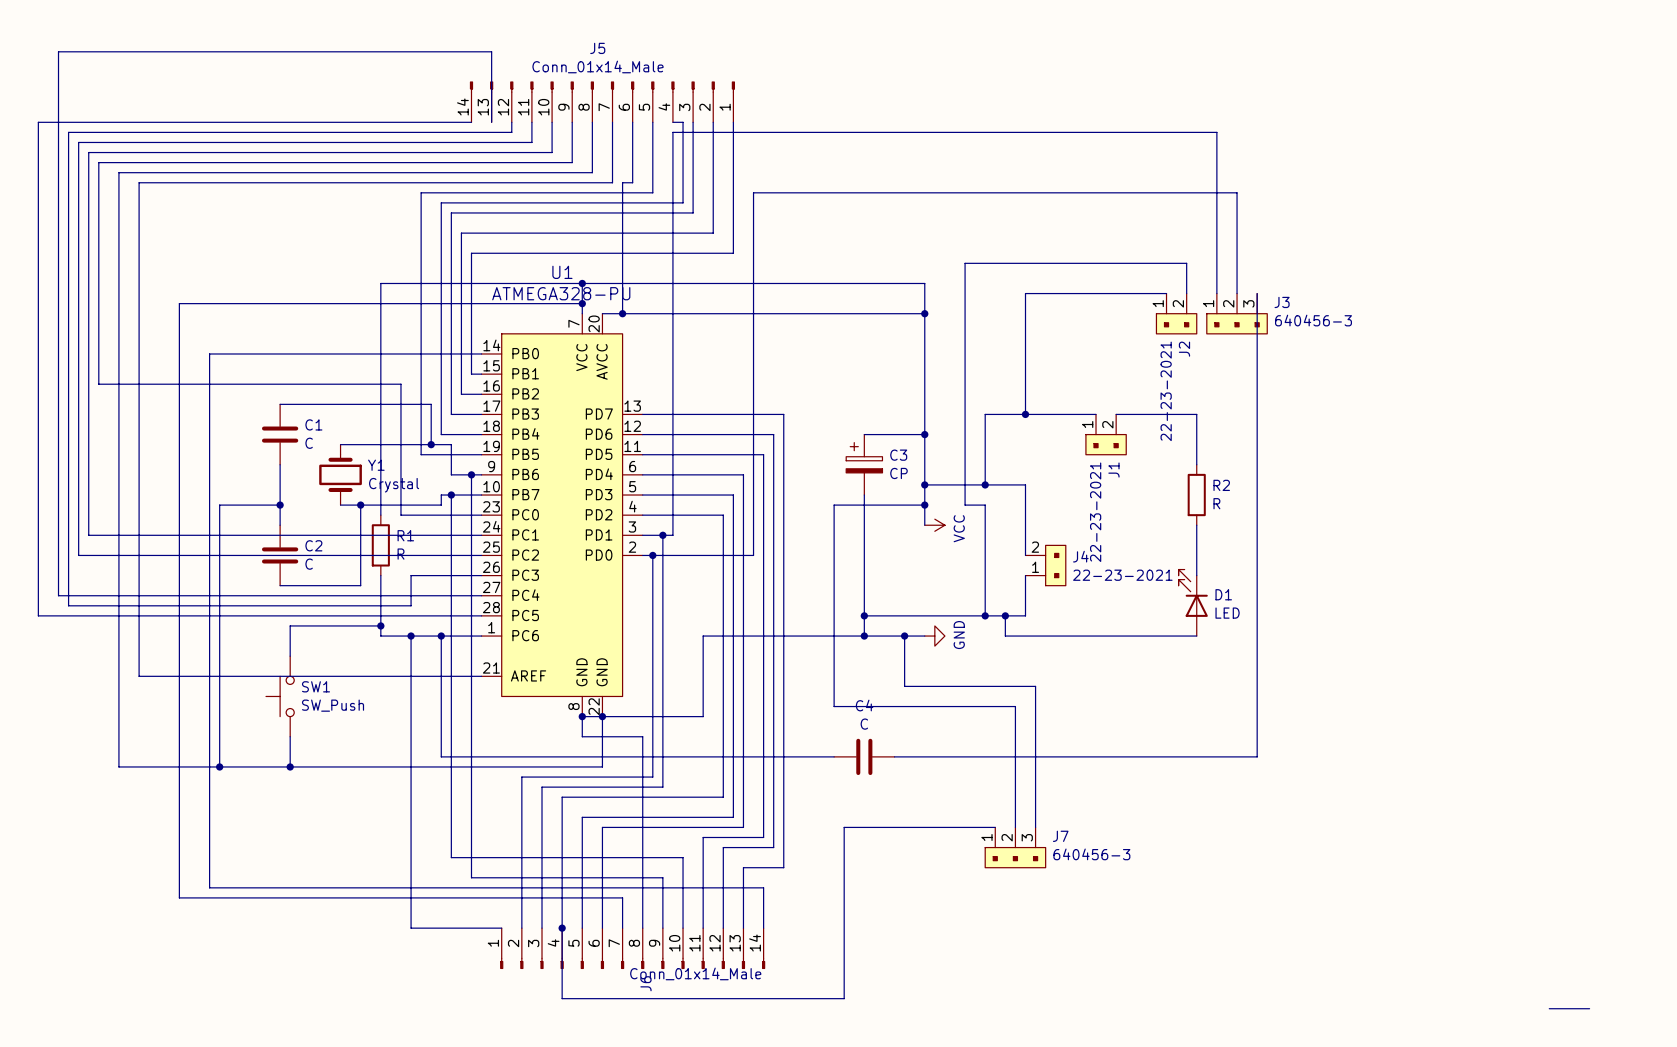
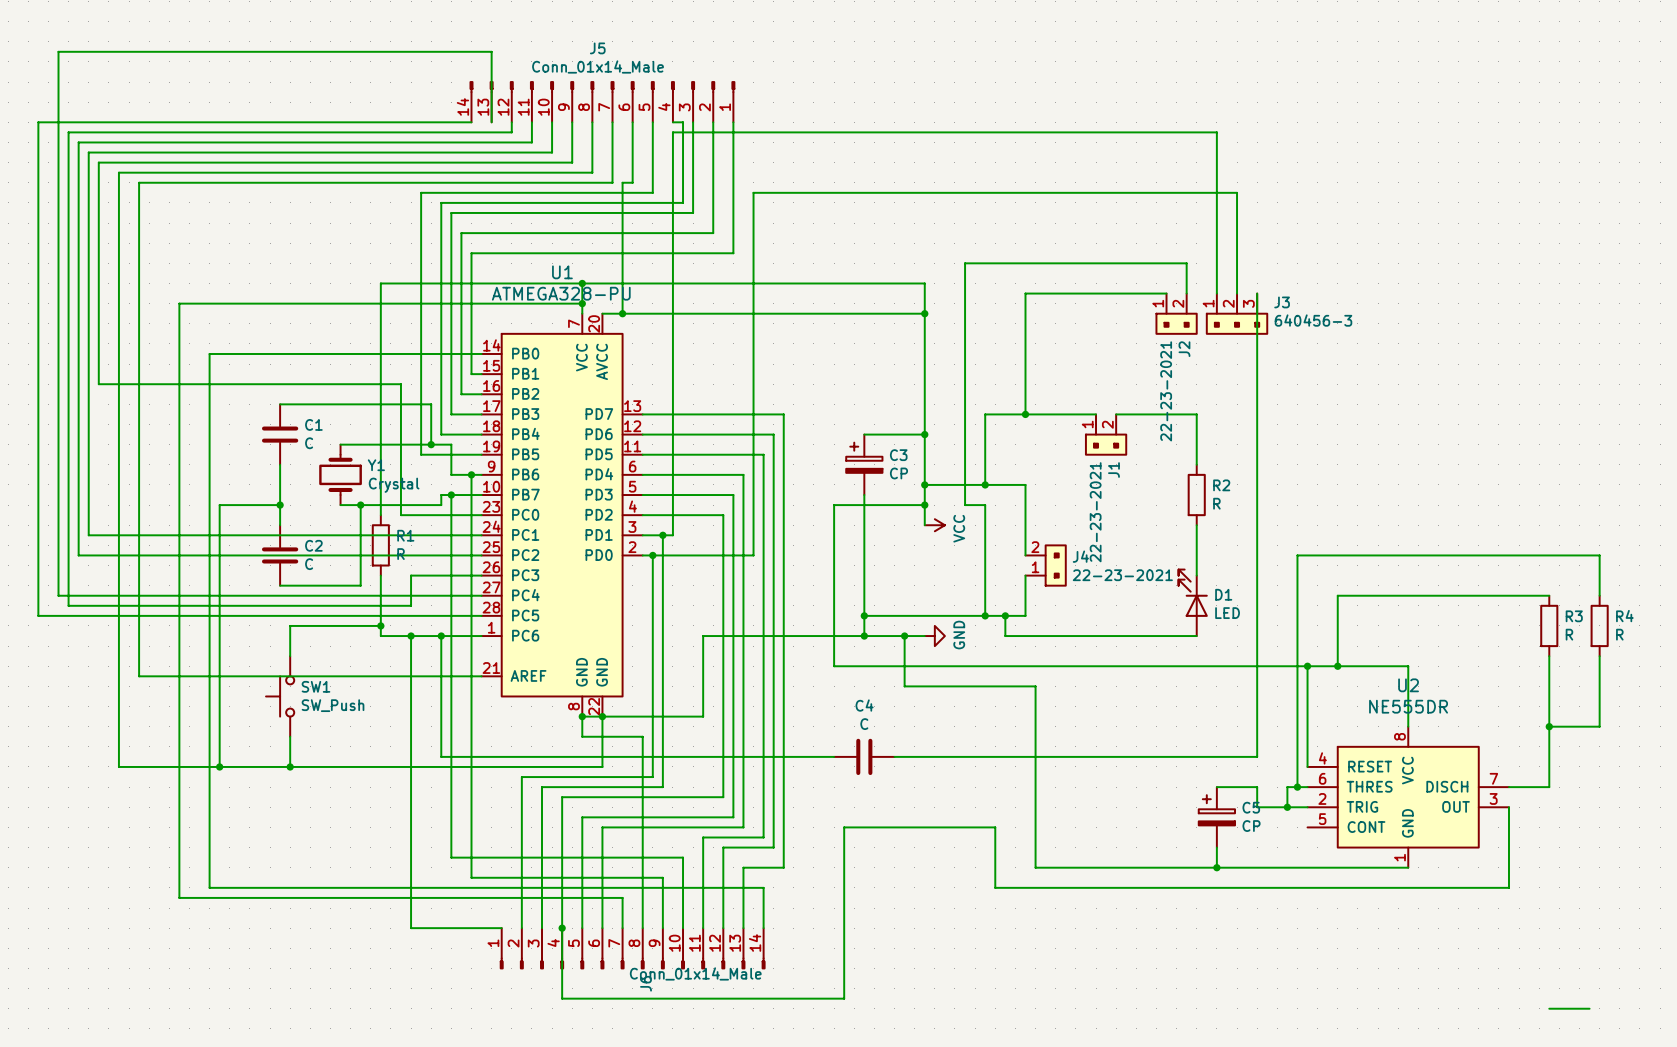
wire: none -> (1549, 595) (1337, 595) (1337, 666)
wire: none -> (1599, 595) (1599, 555) (1297, 555) (1297, 787)
R3: none -> R (1549, 625)
R4: none -> R (1599, 625)
wire: none -> (1549, 656) (1549, 787) (1508, 787)
wire: none -> (1599, 656) (1599, 726) (1549, 726)
wire: (834, 666) (834, 706) (1015, 706) (1015, 827) -> (834, 666) (1408, 666) (1408, 726)
wire: none -> (1307, 666) (1307, 766)
junction: none -> (1307, 666)
junction: none -> (1337, 666)
junction: none -> (1549, 726)
wire: none -> (1216, 787) (1257, 787) (1257, 807) (1307, 807)
junction: none -> (1297, 787)
wire: none -> (1307, 787) (1287, 787) (1287, 807)
U2: none -> NE555DR (1408, 797)
junction: none -> (1287, 807)
wire: none -> (1508, 807) (1508, 887) (995, 887) (995, 827)
C5: none -> CP (1216, 817)
wire: none -> (1035, 827) (1035, 867) (1408, 867)
J7: 640456-3 (1015, 847) -> none
wire: none -> (1216, 847) (1216, 867)
junction: none -> (1216, 867)

